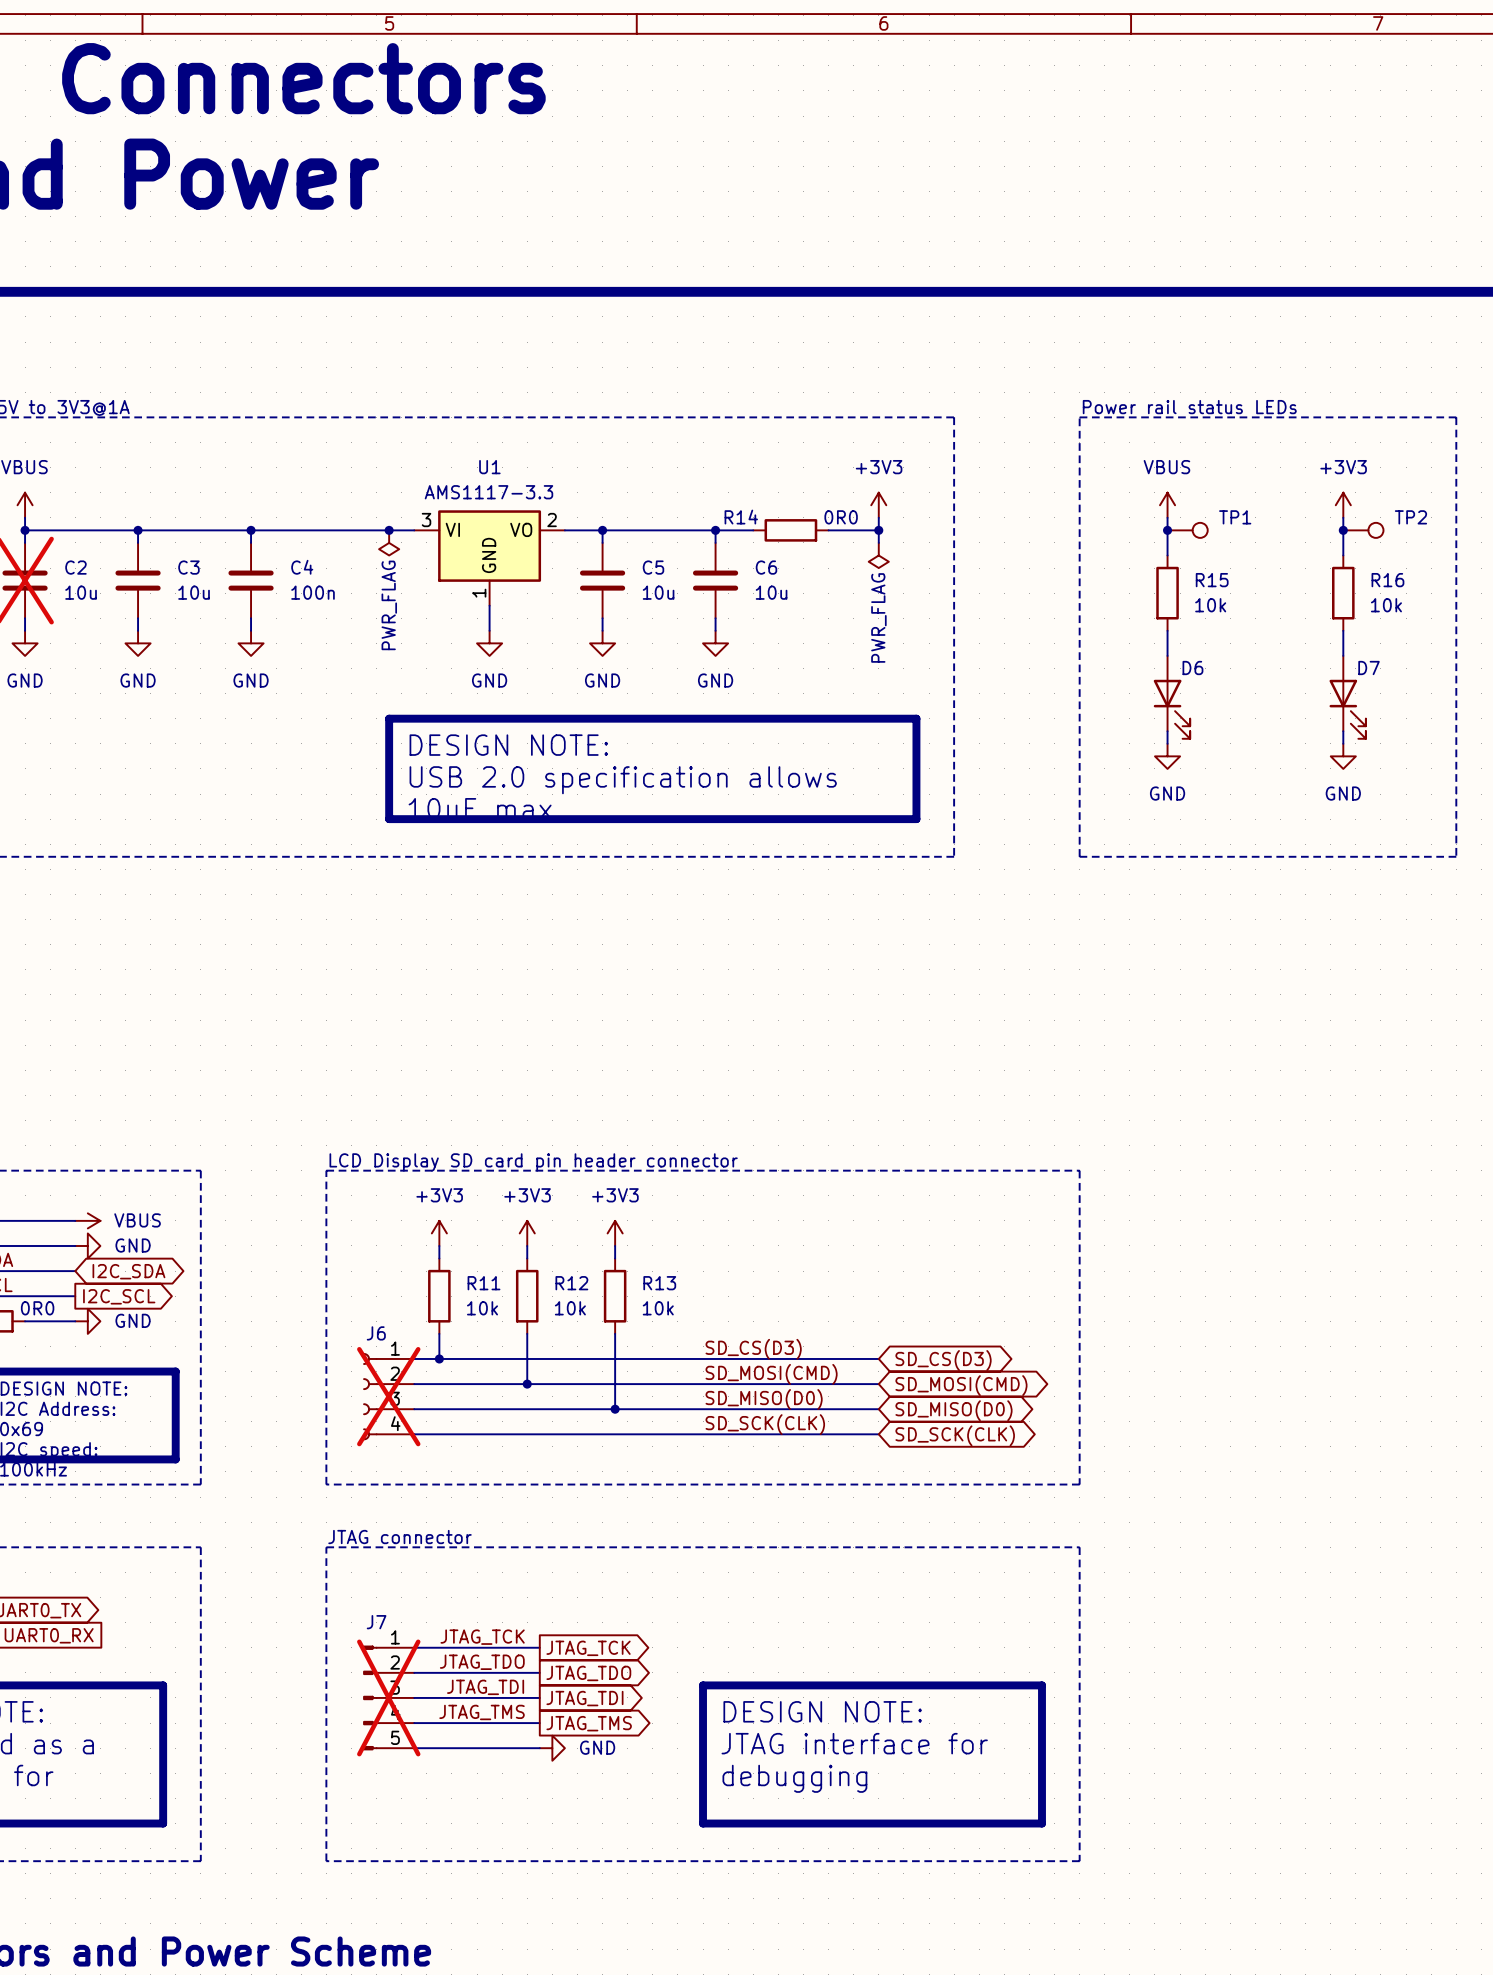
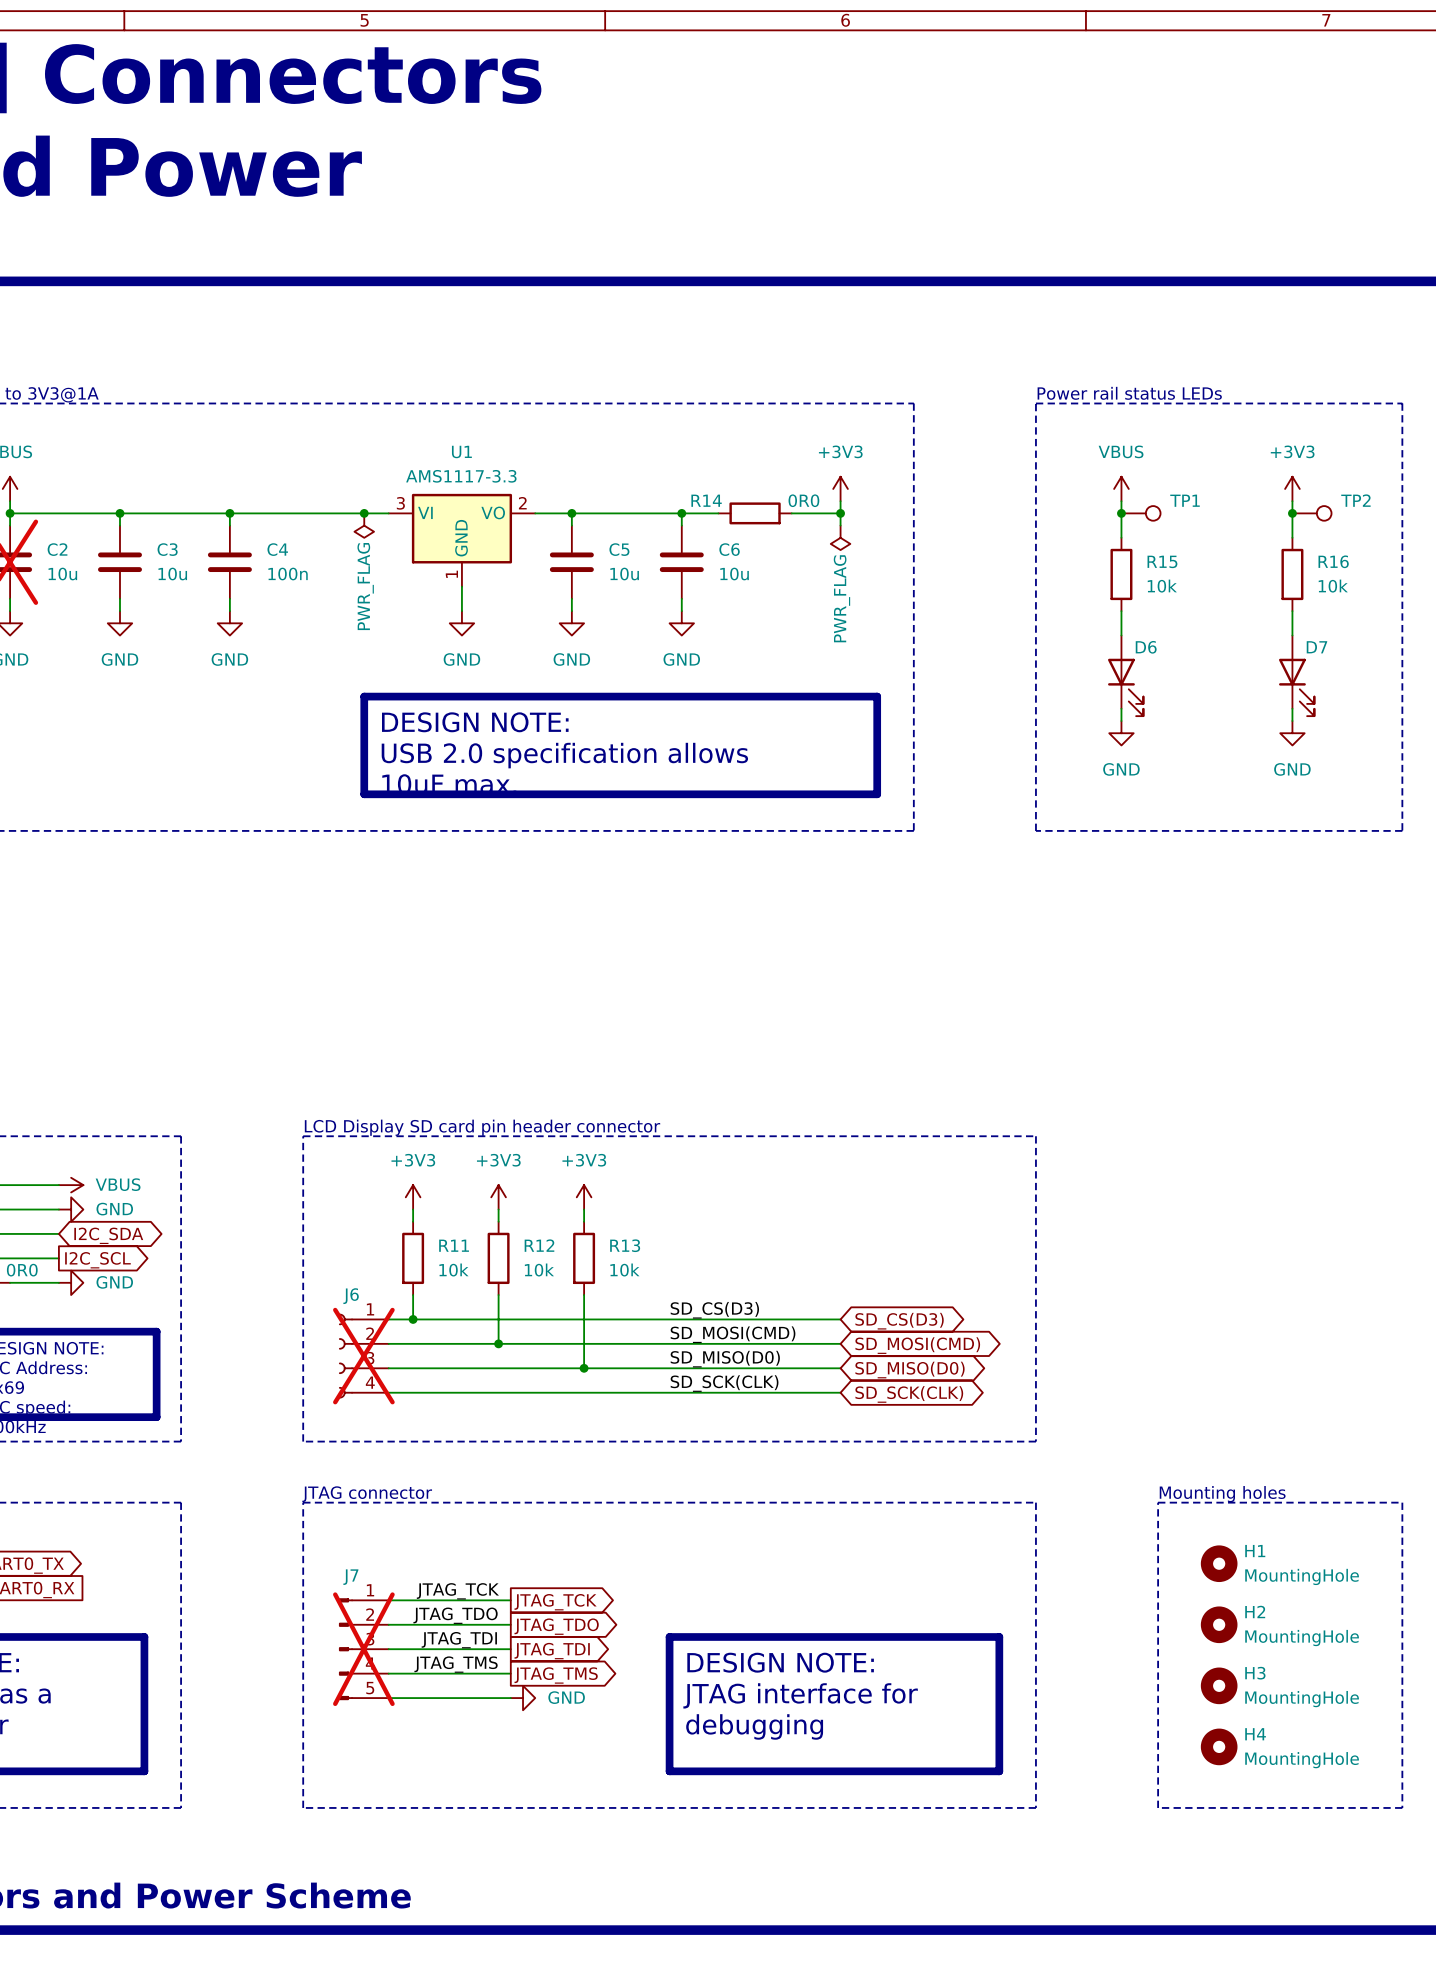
text: none -> Mounting holes (1222, 1494)
line: none -> (1158, 1502) (1402, 1502) (1402, 1807) (1158, 1807) (1158, 1502)
H1: none -> MountingHole (1219, 1563)
H2: none -> MountingHole (1219, 1624)
H3: none -> MountingHole (1219, 1685)
H4: none -> MountingHole (1219, 1746)

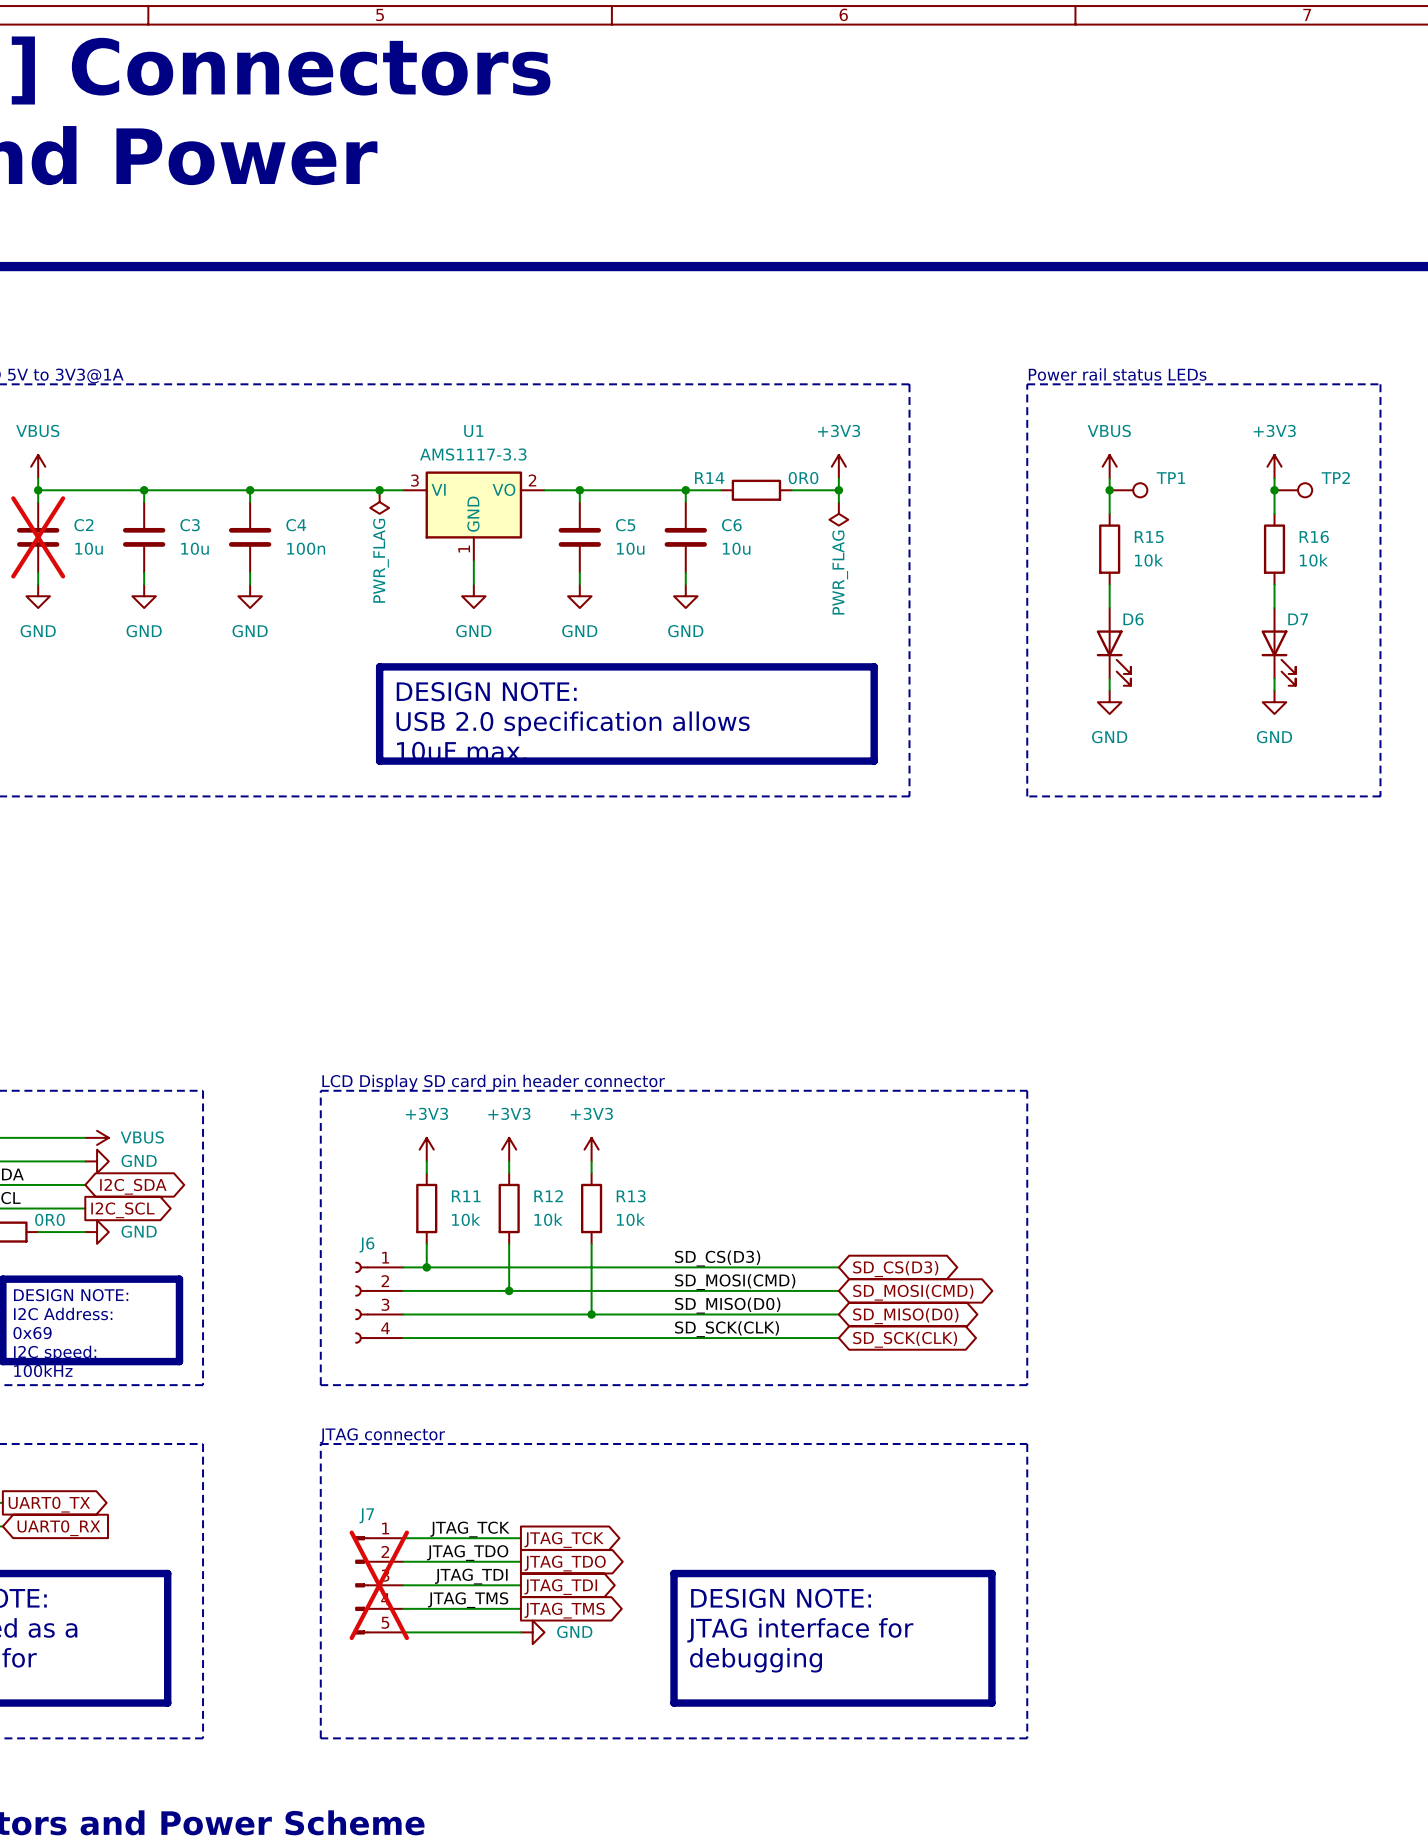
J6 do-not-place cross: (363, 1356) -> none
text: Mounting holes (1222, 1494) -> none
line: (1158, 1502) (1402, 1502) (1402, 1807) (1158, 1807) (1158, 1502) -> none
H1: MountingHole (1219, 1563) -> none
H2: MountingHole (1219, 1624) -> none
H3: MountingHole (1219, 1685) -> none
H4: MountingHole (1219, 1746) -> none

